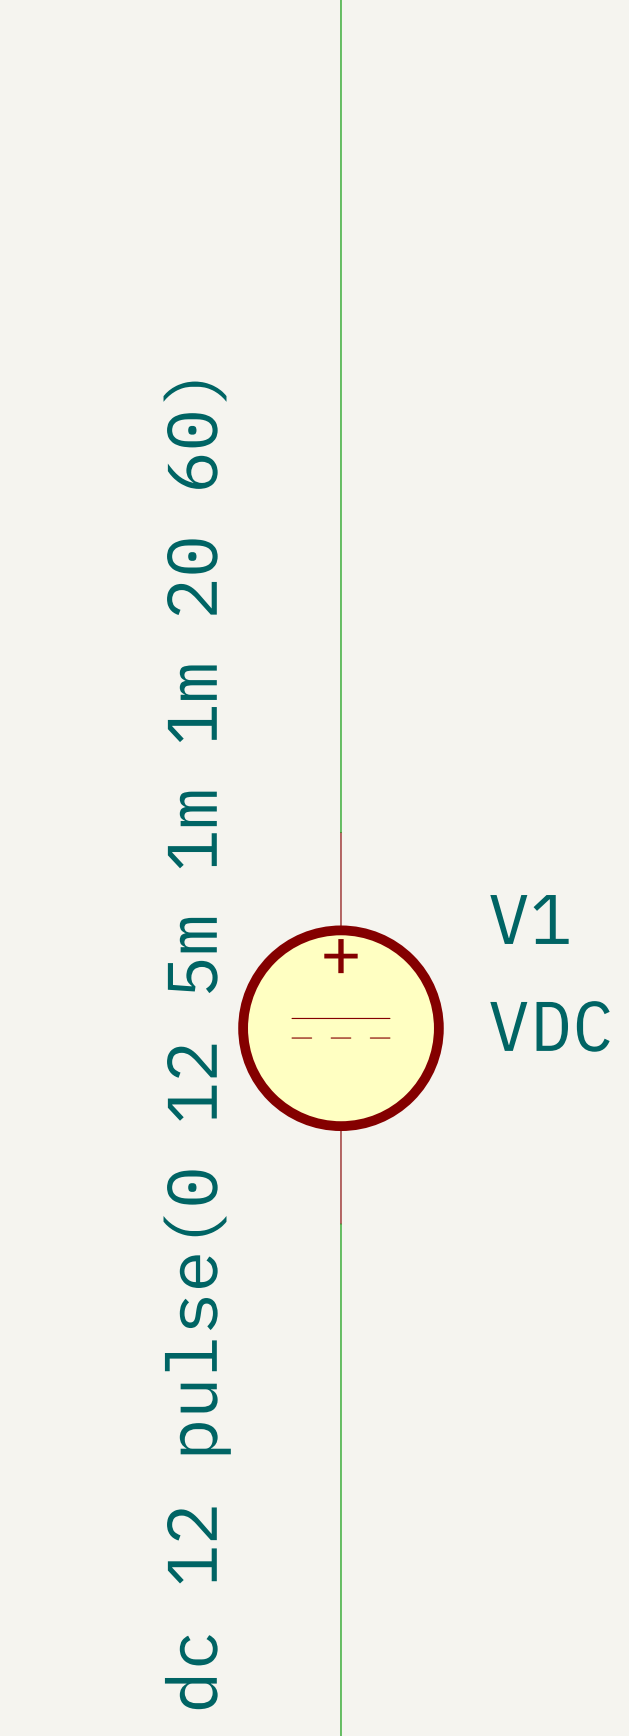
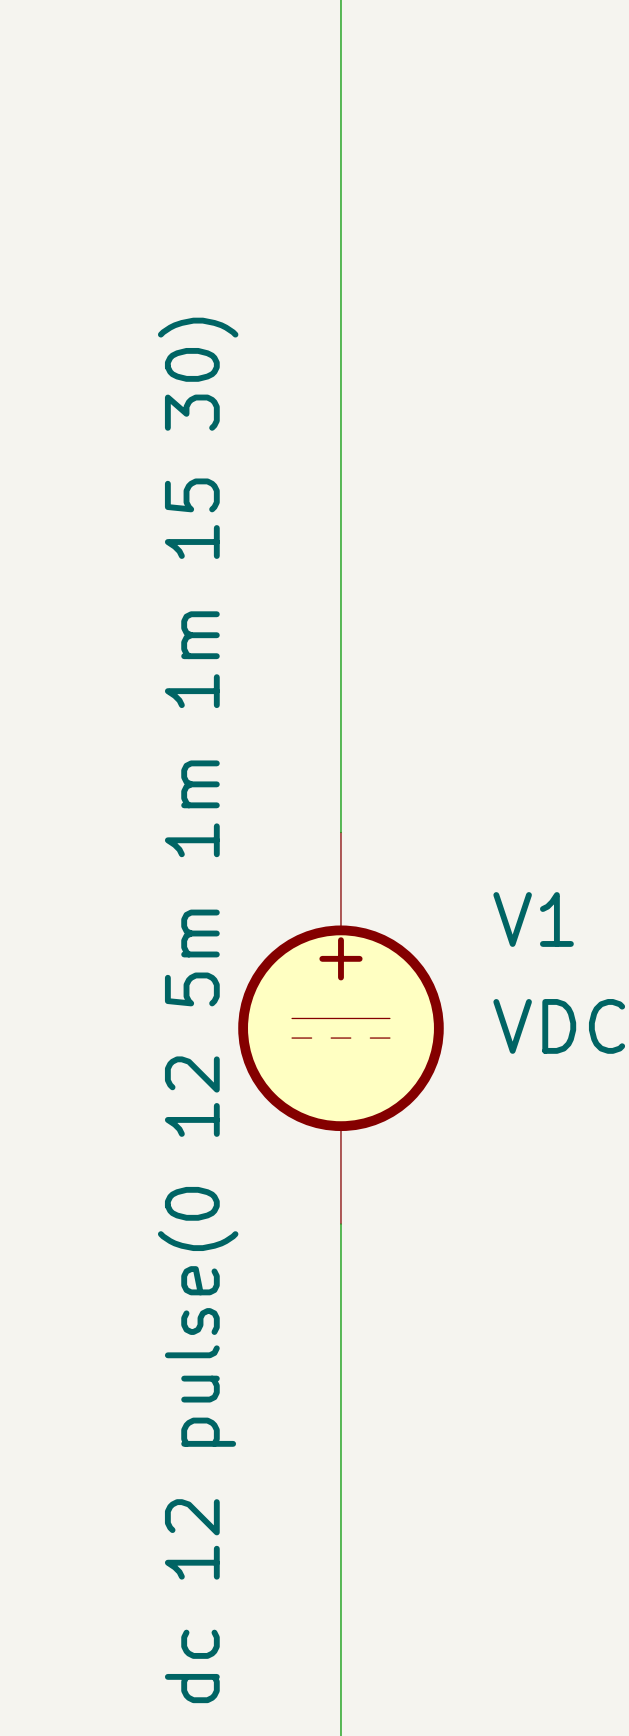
V1 text: dc 12 pulse(0 12 5m 1m 1m 20 60) (197, 1045) -> dc 12 pulse(0 12 5m 1m 1m 15 30) (198, 1010)

